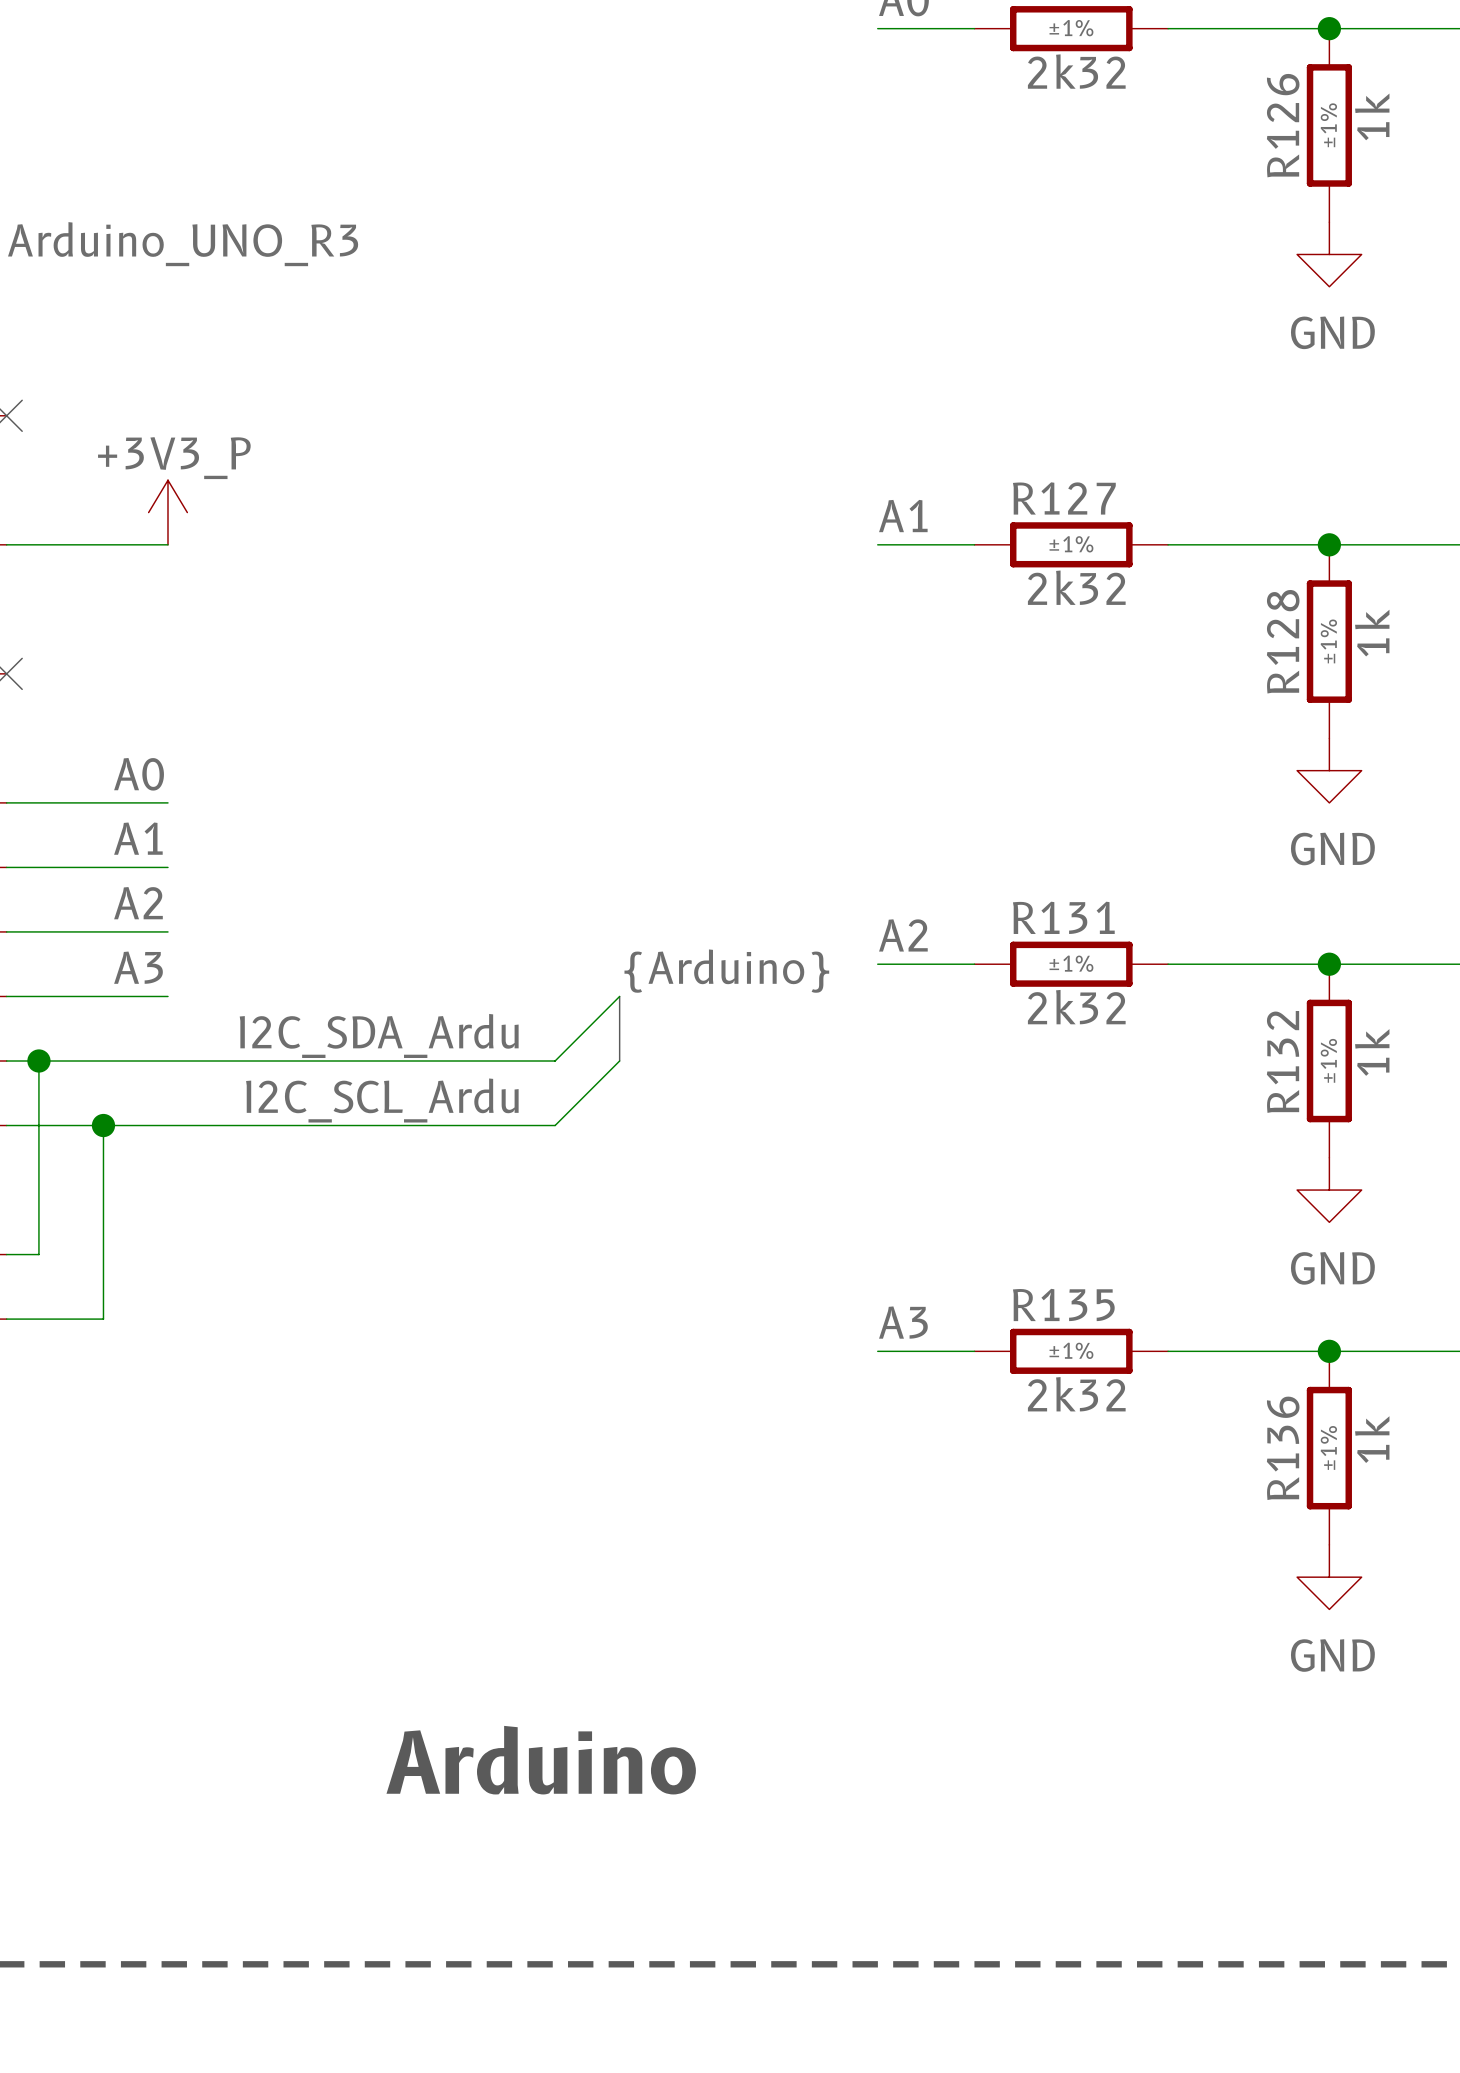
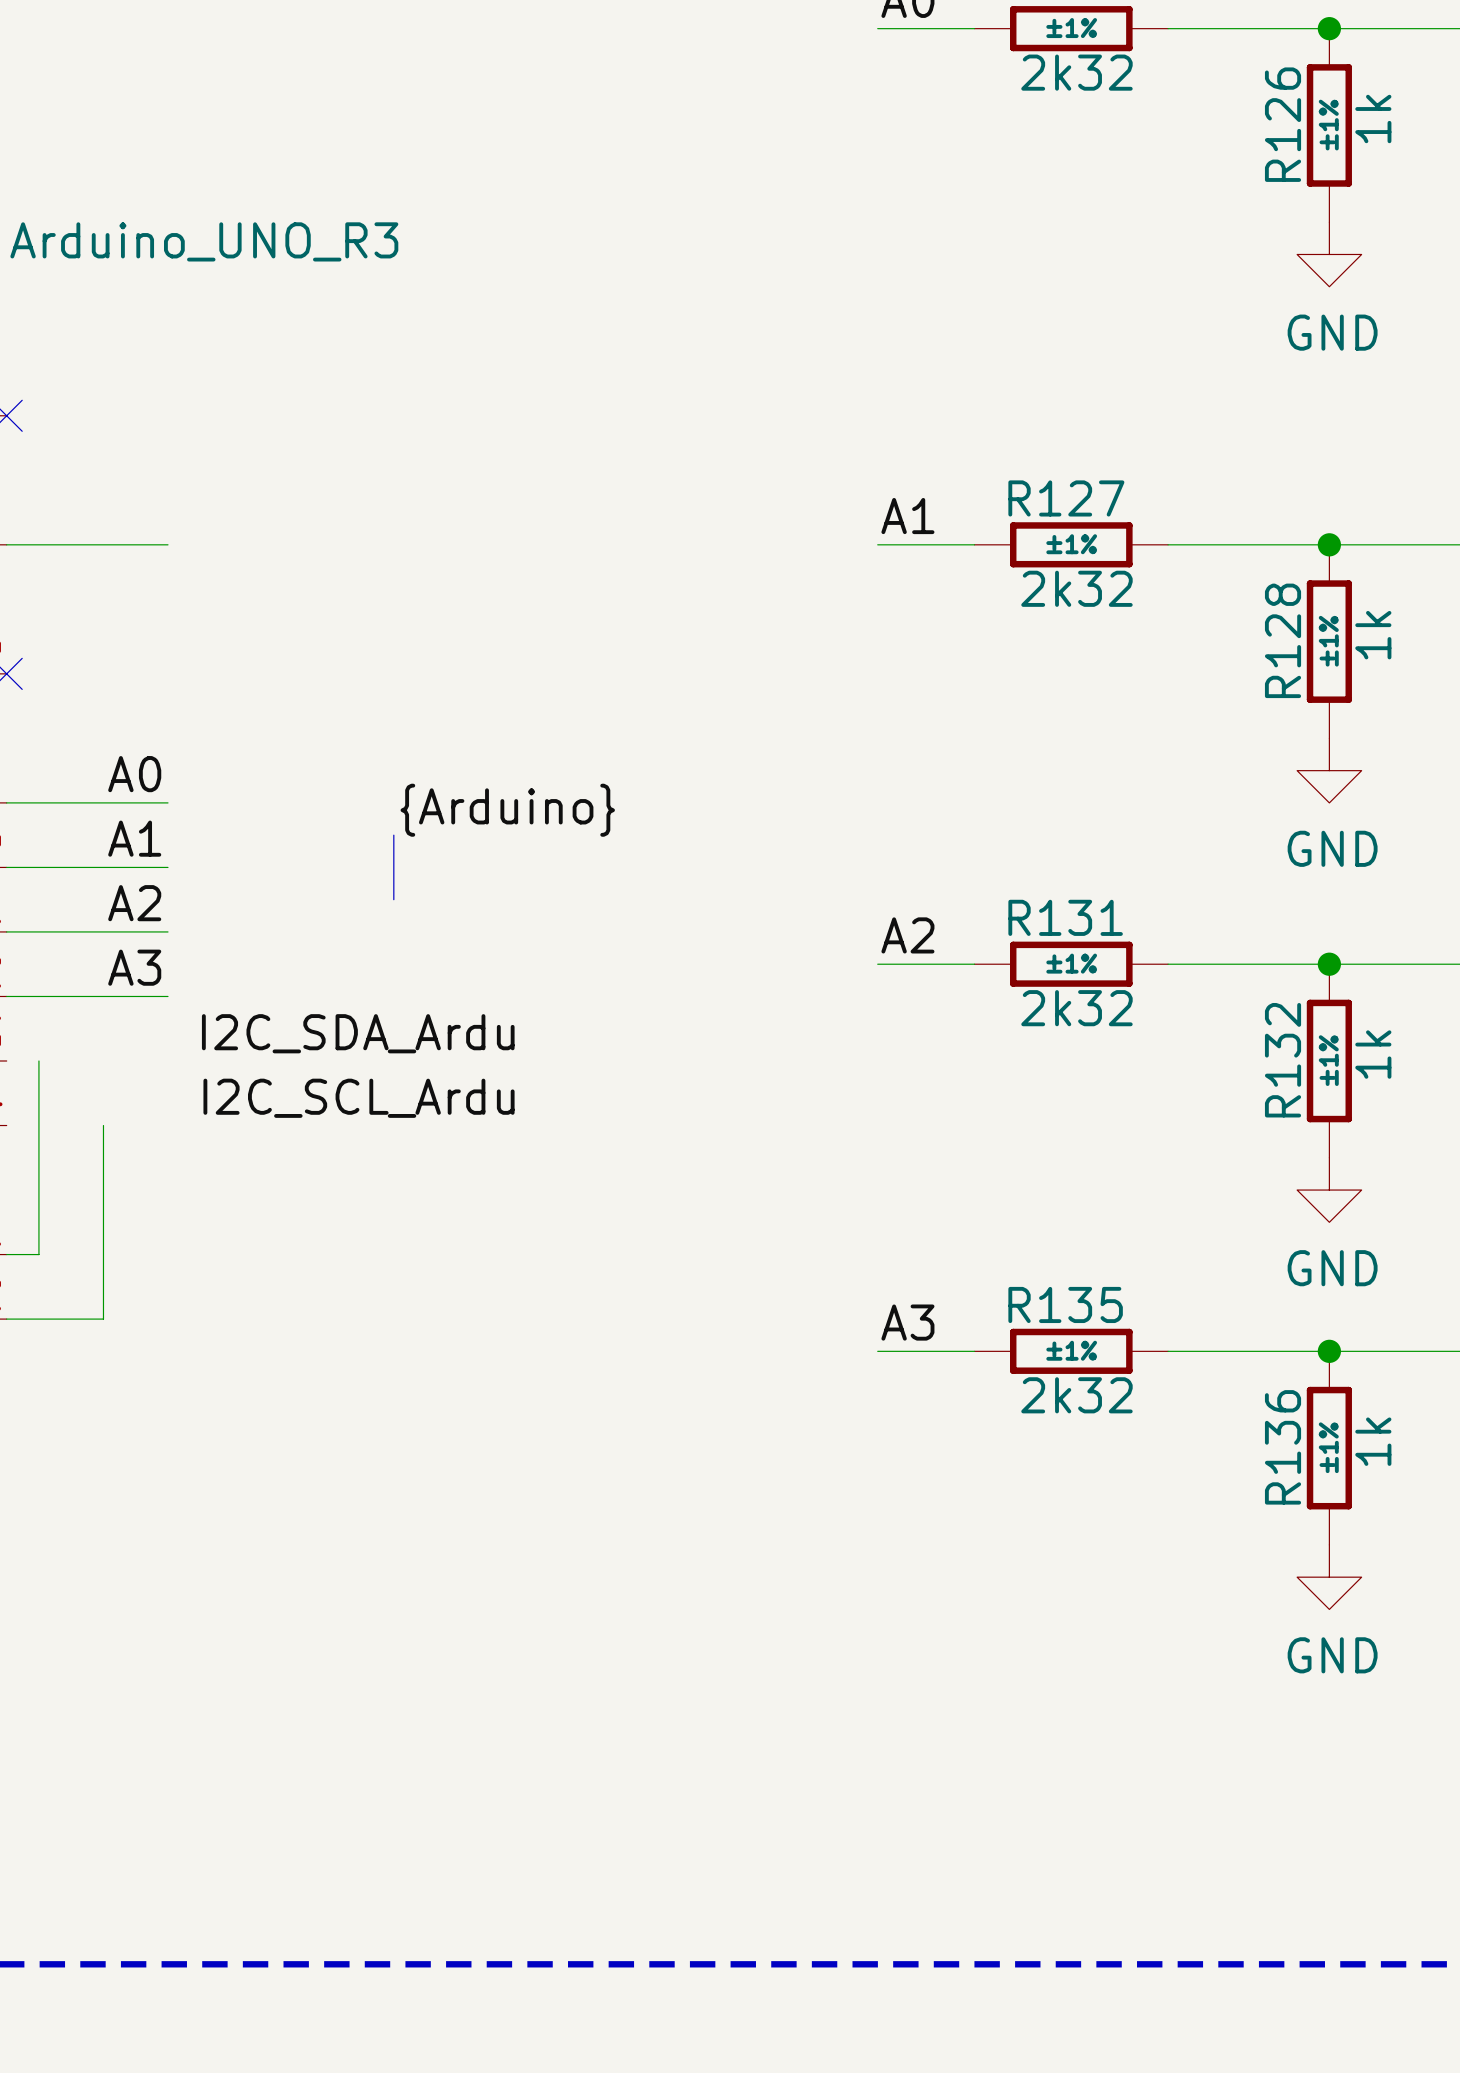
power symbol: +3V3_P (167, 512) -> none
label position: {Arduino} (726, 971) -> {Arduino} (507, 810)
wire: (619, 996) (555, 1061) (6, 1061) -> none
bus: (619, 996) (619, 1061) -> (393, 835) (393, 899)
junction: (38, 1061) -> none
wire: (619, 1061) (555, 1125) (6, 1125) -> none
junction: (103, 1125) -> none
text: Arduino (541, 1760) -> none

